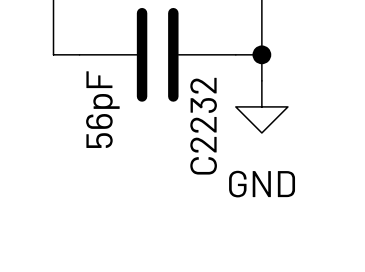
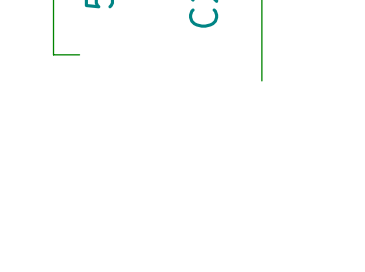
C2232: 56pF (157, 54) -> none
wire: (235, 54) (261, 54) -> none
junction: (261, 54) -> none
power symbol: GND (261, 106) -> none

